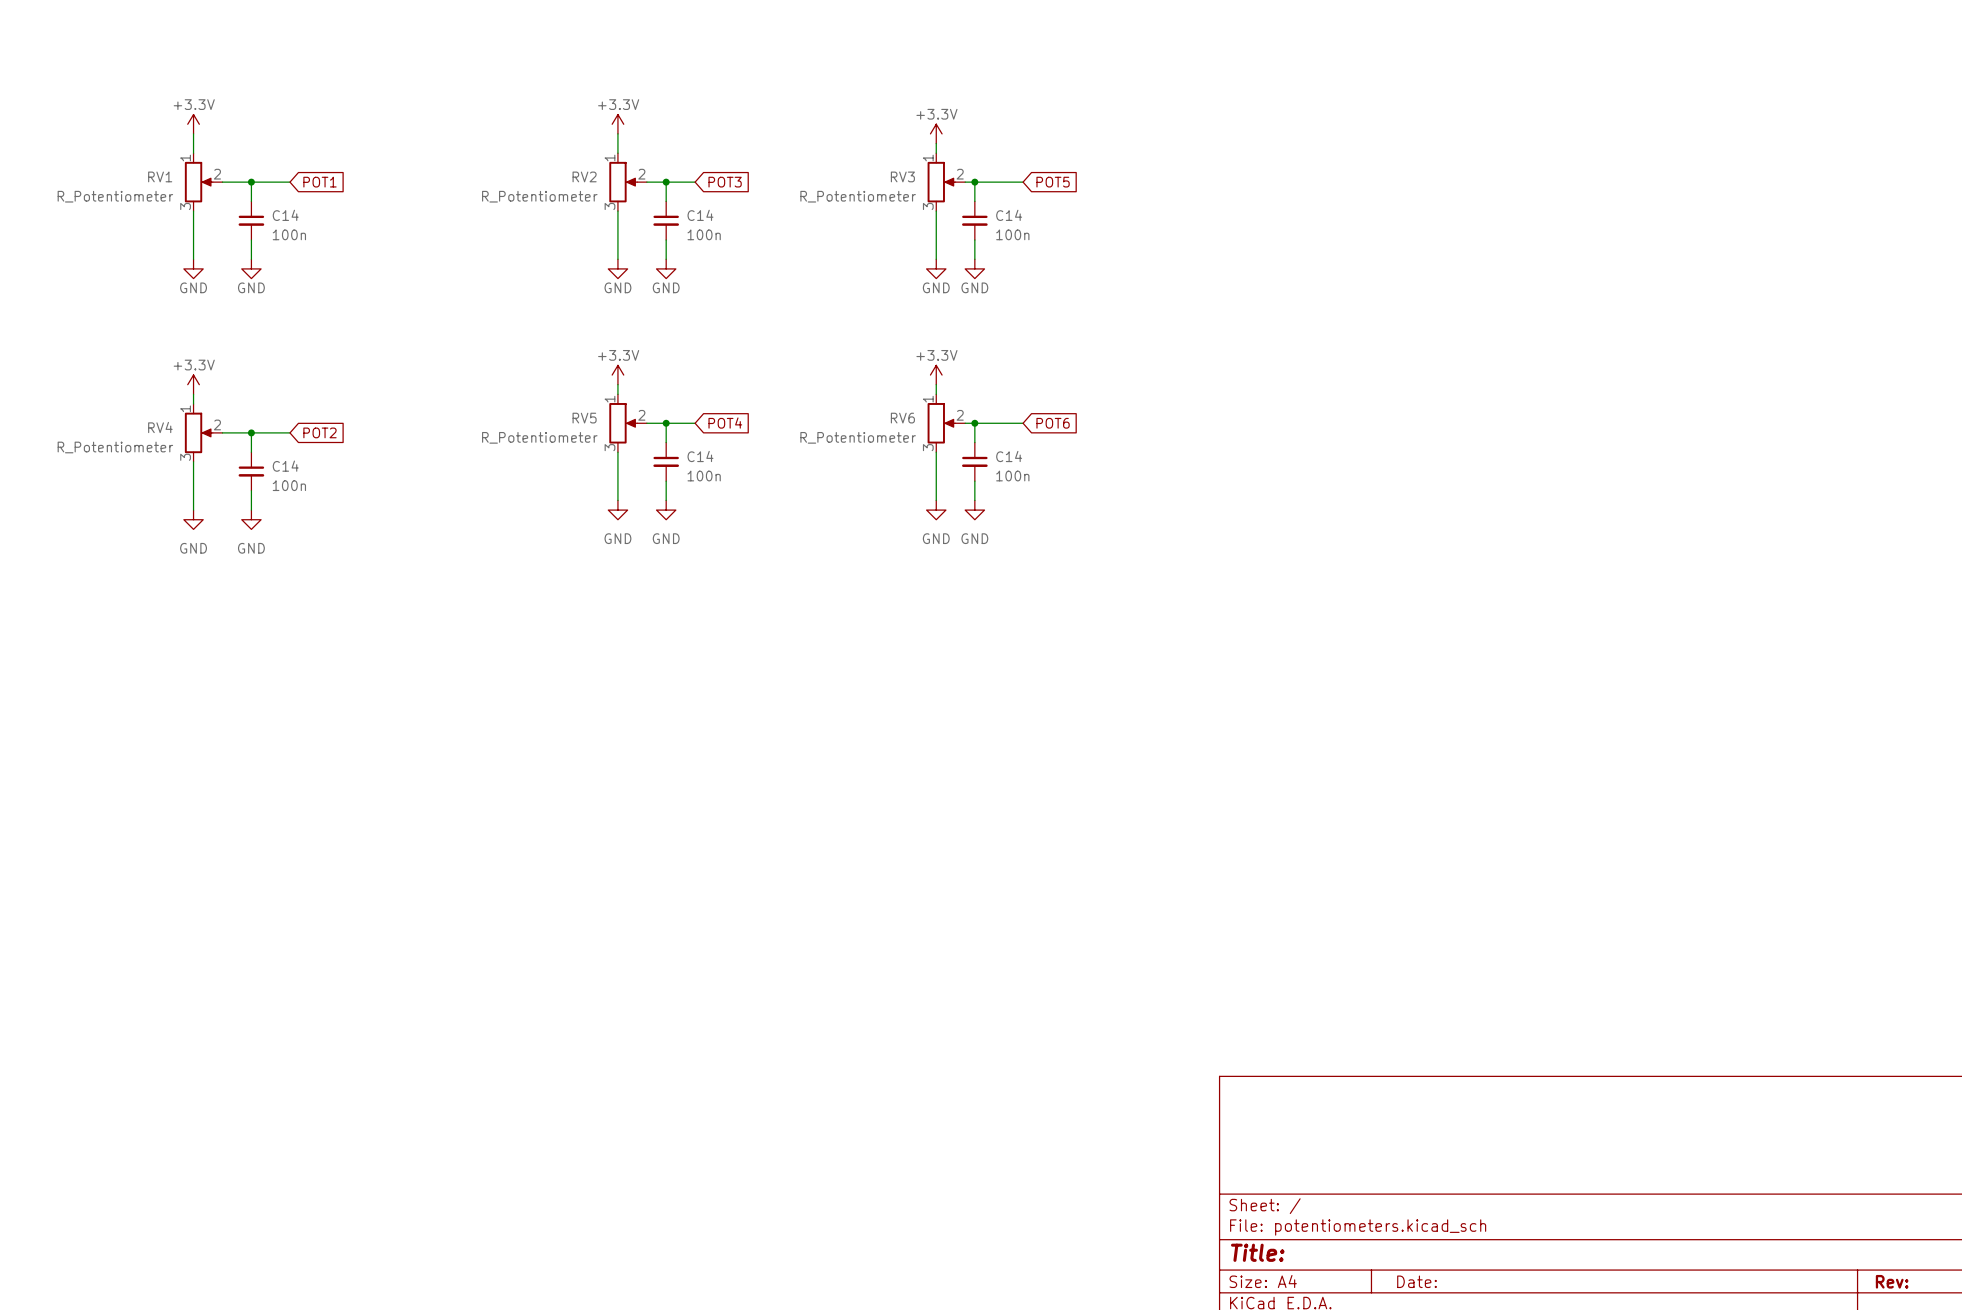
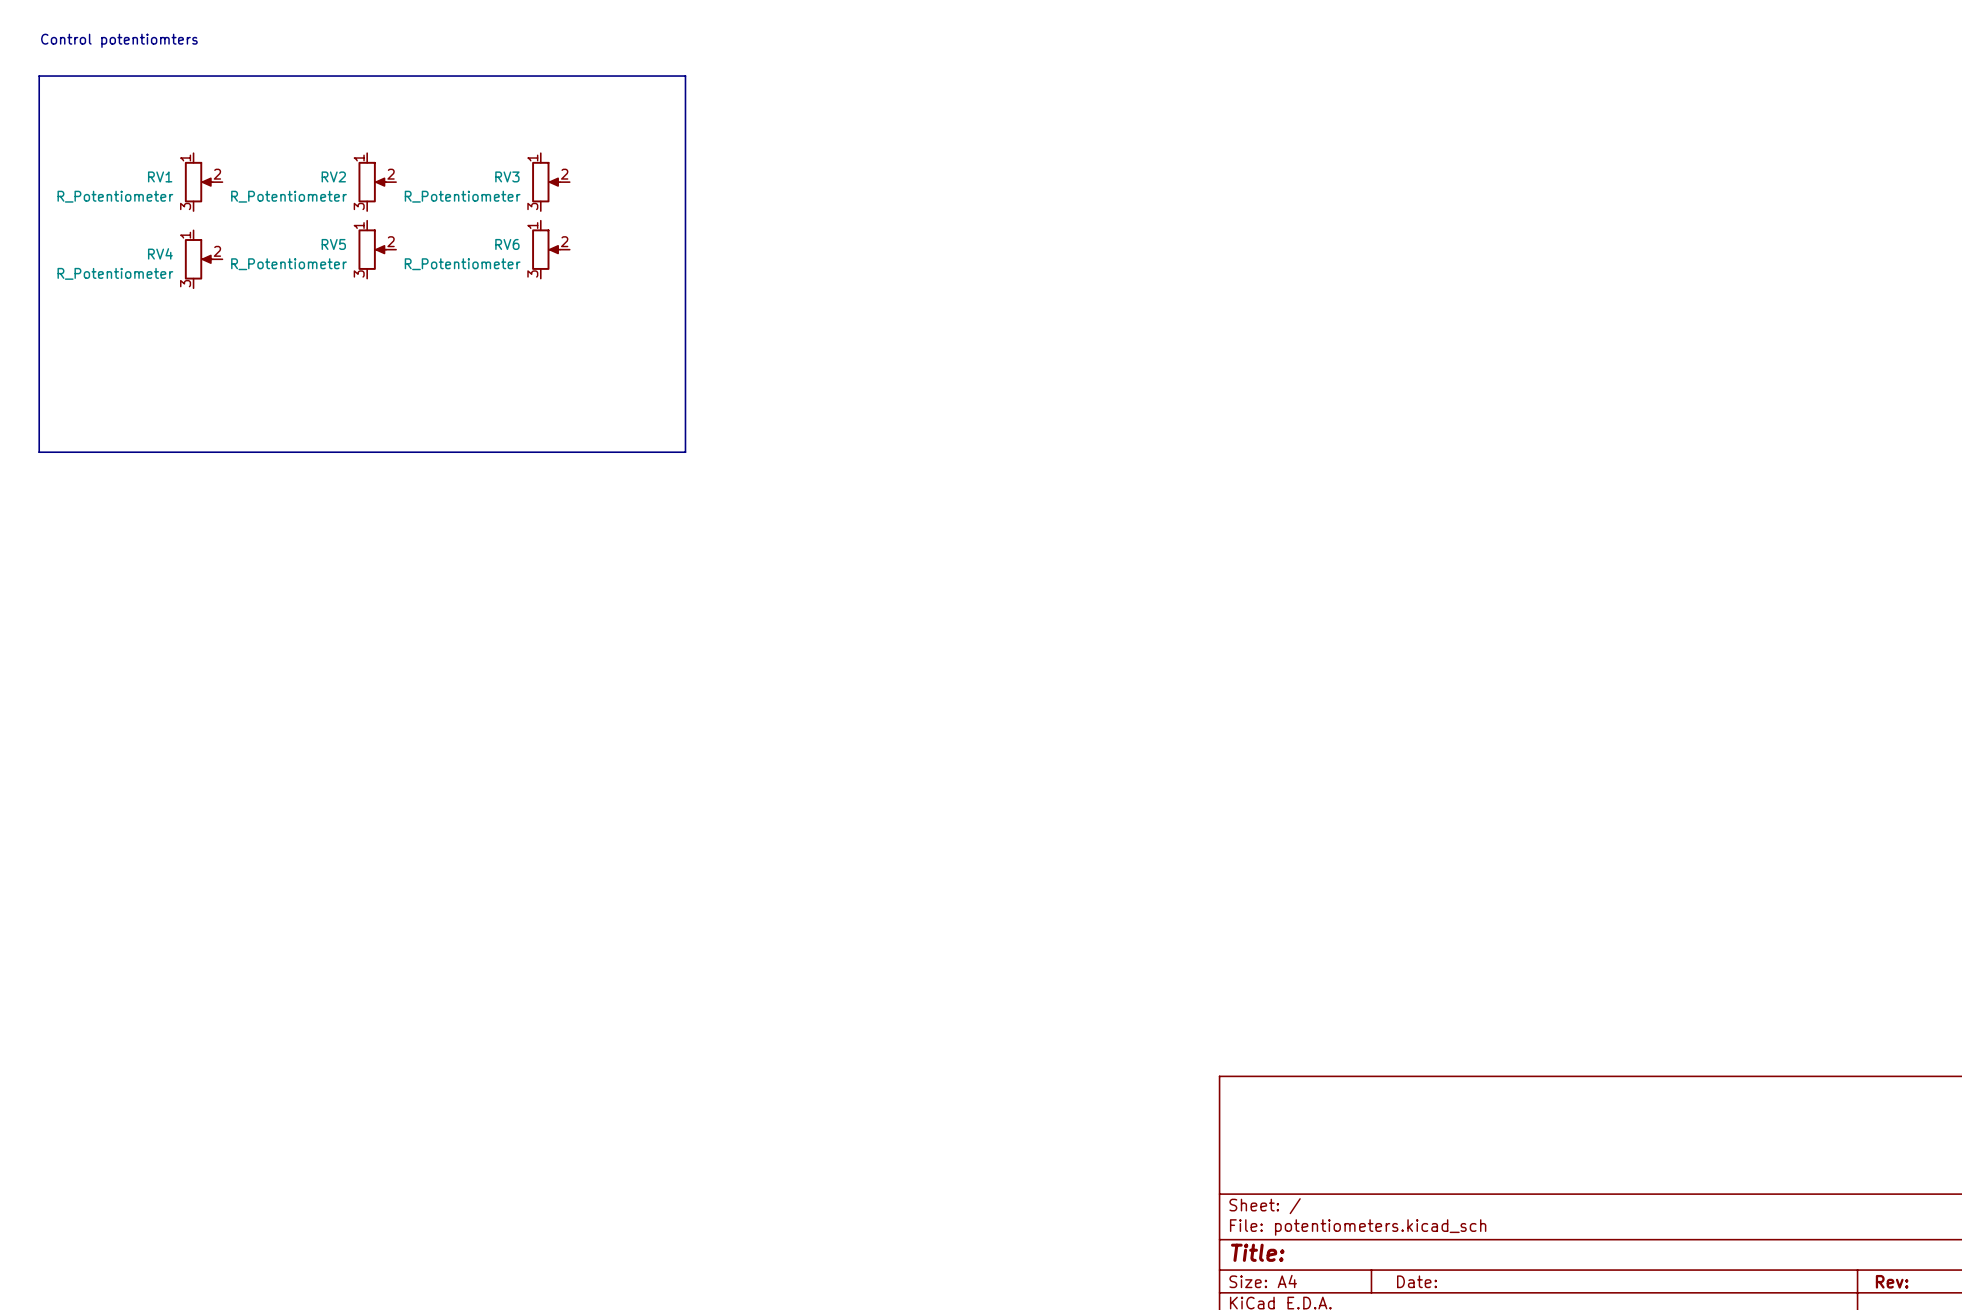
text: none -> Control potentiomters (119, 40)
line: none -> (39, 76) (685, 76) (685, 452) (39, 452) (39, 76)
power symbol: +3.3V (193, 124) -> none
power symbol: +3.3V (617, 124) -> none
wire: (193, 133) (193, 153) -> none
wire: (617, 133) (617, 153) -> none
power symbol: +3.3V (936, 133) -> none
wire: (936, 143) (936, 153) -> none
wire: (222, 182) (289, 182) -> none
wire: (251, 182) (251, 201) -> none
junction: (251, 182) -> none
global label: POT1 (319, 182) -> none
RV2 position: (628, 182) -> (377, 182)
wire: (646, 182) (695, 182) -> none
wire: (666, 182) (666, 201) -> none
junction: (666, 182) -> none
global label: POT3 (725, 182) -> none
RV3 position: (946, 182) -> (550, 182)
wire: (965, 182) (1023, 182) -> none
wire: (974, 182) (974, 201) -> none
junction: (974, 182) -> none
global label: POT5 (1053, 182) -> none
wire: (193, 211) (193, 259) -> none
wire: (617, 211) (617, 259) -> none
wire: (936, 211) (936, 259) -> none
C14: 100n (251, 220) -> none
C14: 100n (666, 220) -> none
C14: 100n (974, 220) -> none
wire: (251, 240) (251, 259) -> none
wire: (666, 240) (666, 259) -> none
wire: (974, 240) (974, 259) -> none
power symbol: GND (193, 268) -> none
power symbol: GND (251, 268) -> none
power symbol: GND (617, 268) -> none
power symbol: GND (666, 268) -> none
power symbol: GND (936, 268) -> none
power symbol: GND (974, 268) -> none
power symbol: +3.3V (617, 375) -> none
power symbol: +3.3V (936, 375) -> none
power symbol: +3.3V (193, 384) -> none
wire: (617, 384) (617, 394) -> none
wire: (936, 384) (936, 394) -> none
wire: (193, 394) (193, 403) -> none
RV5 position: (628, 423) -> (377, 249)
wire: (646, 423) (695, 423) -> none
wire: (666, 423) (666, 442) -> none
junction: (666, 423) -> none
global label: POT4 (725, 423) -> none
RV6 position: (946, 423) -> (550, 249)
wire: (965, 423) (1023, 423) -> none
wire: (974, 423) (974, 442) -> none
junction: (974, 423) -> none
global label: POT6 (1053, 423) -> none
RV4 position: (203, 432) -> (203, 259)
wire: (222, 432) (289, 432) -> none
wire: (251, 432) (251, 452) -> none
junction: (251, 432) -> none
global label: POT2 (319, 432) -> none
wire: (617, 452) (617, 500) -> none
wire: (936, 452) (936, 500) -> none
wire: (193, 461) (193, 510) -> none
C14: 100n (666, 461) -> none
C14: 100n (974, 461) -> none
C14: 100n (251, 471) -> none
wire: (666, 481) (666, 500) -> none
wire: (974, 481) (974, 500) -> none
wire: (251, 490) (251, 510) -> none
power symbol: GND (617, 510) -> none
power symbol: GND (666, 510) -> none
power symbol: GND (936, 510) -> none
power symbol: GND (974, 510) -> none
power symbol: GND (193, 519) -> none
power symbol: GND (251, 519) -> none

